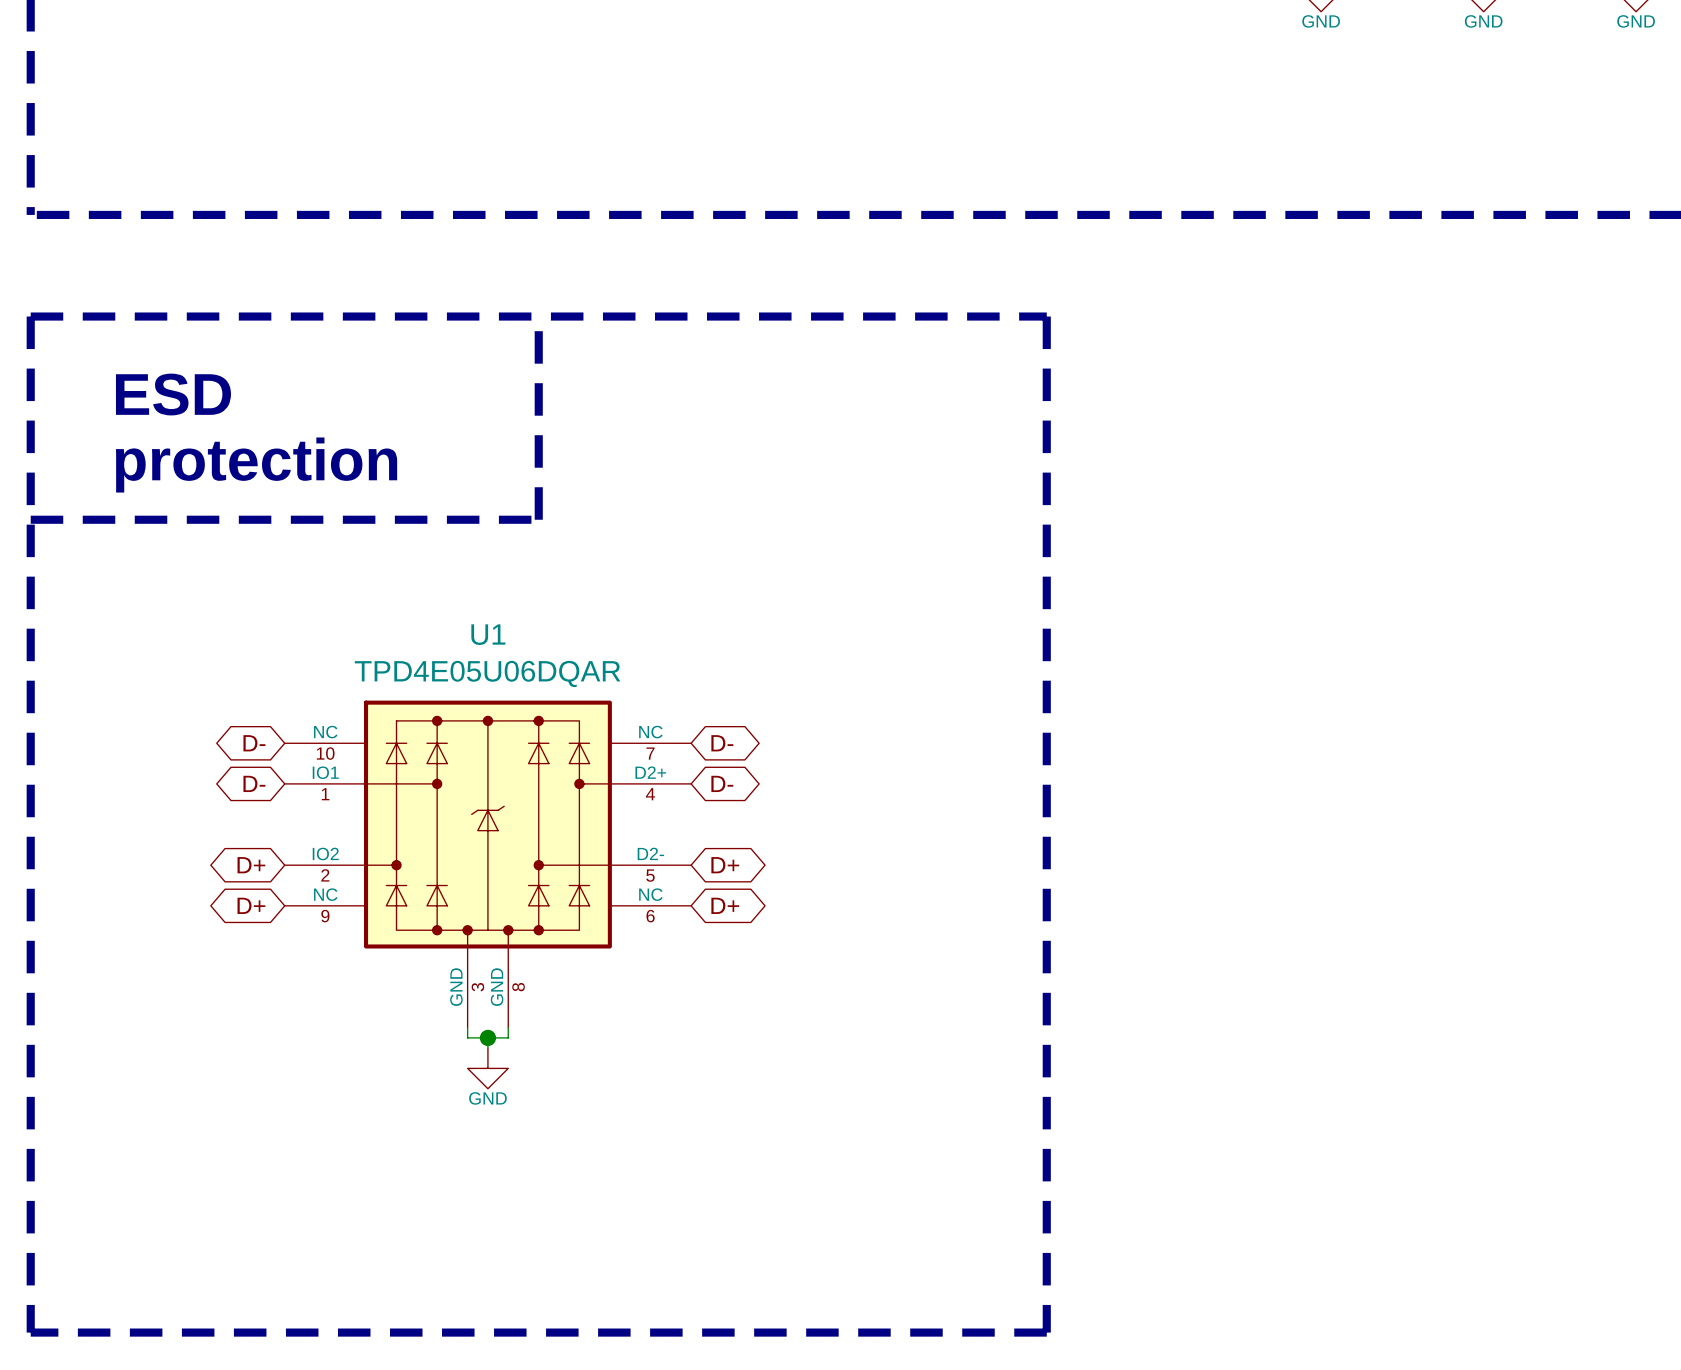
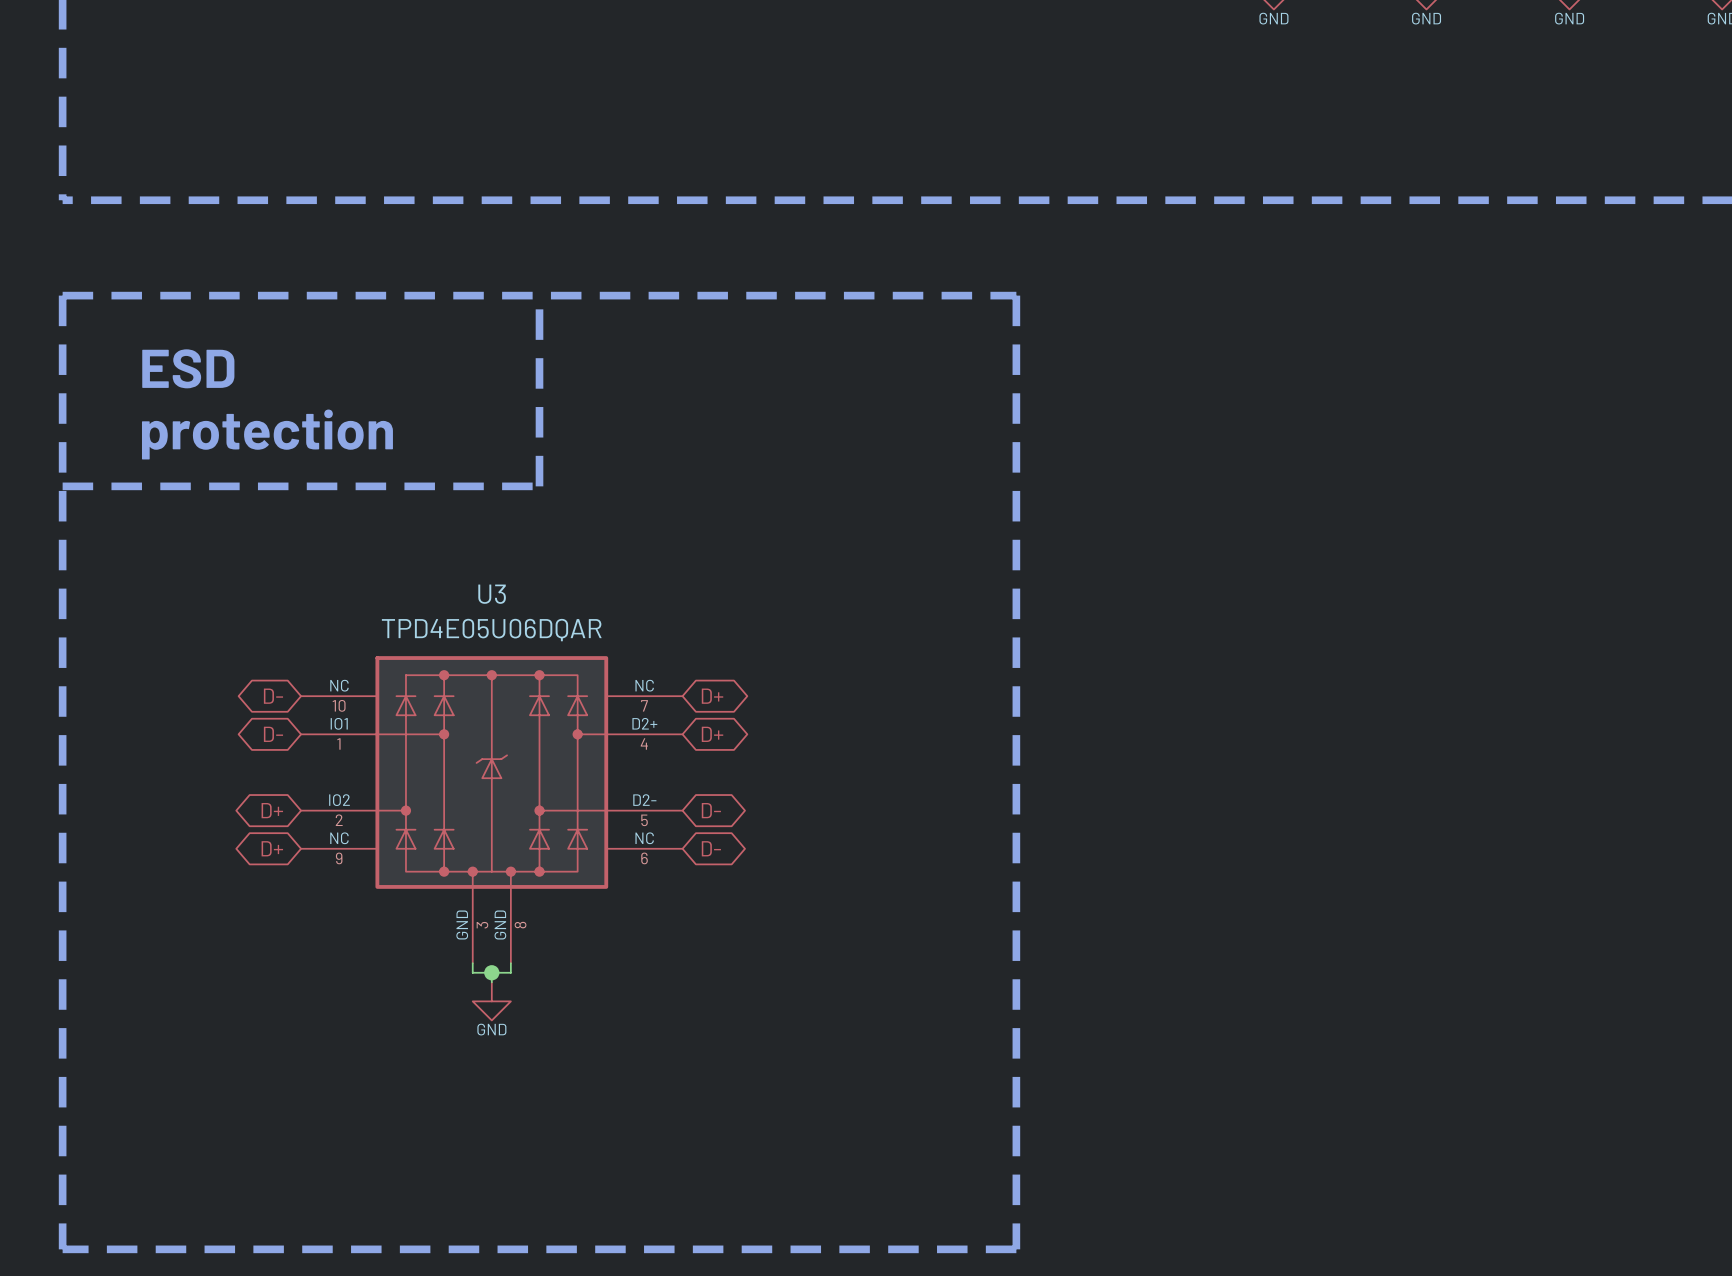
U1 name: U1 (488, 634) -> U3 (492, 594)
global label: D- (722, 743) -> D+ (712, 696)
global label: D- (722, 783) -> D+ (712, 734)
global label: D+ (725, 865) -> D- (711, 810)
global label: D+ (725, 905) -> D- (711, 848)

